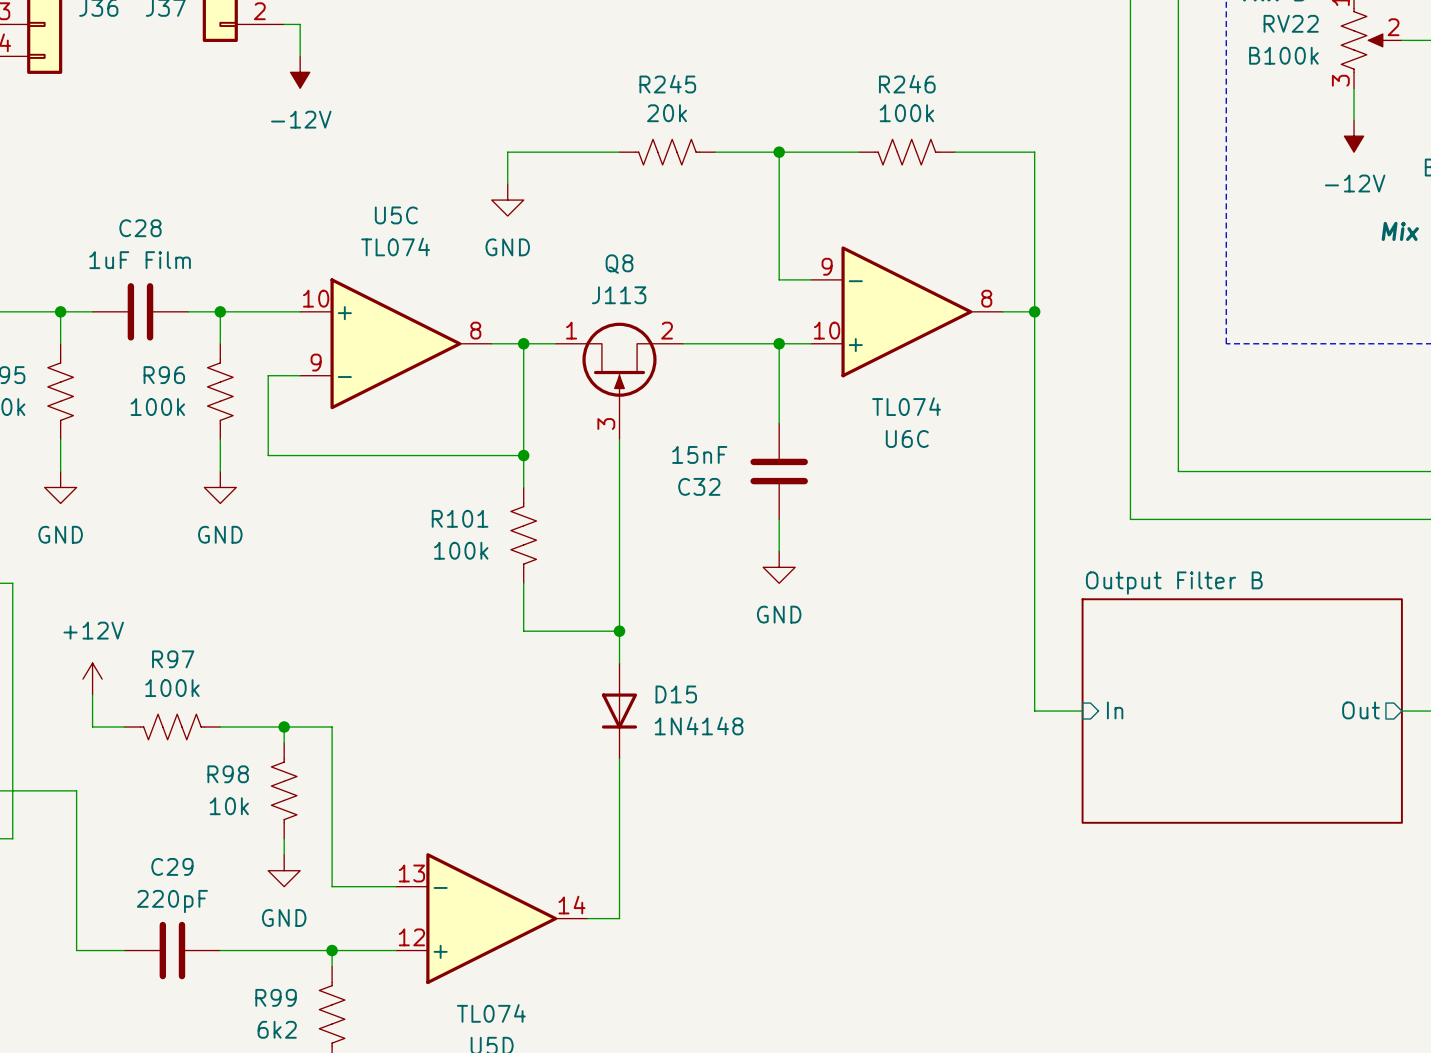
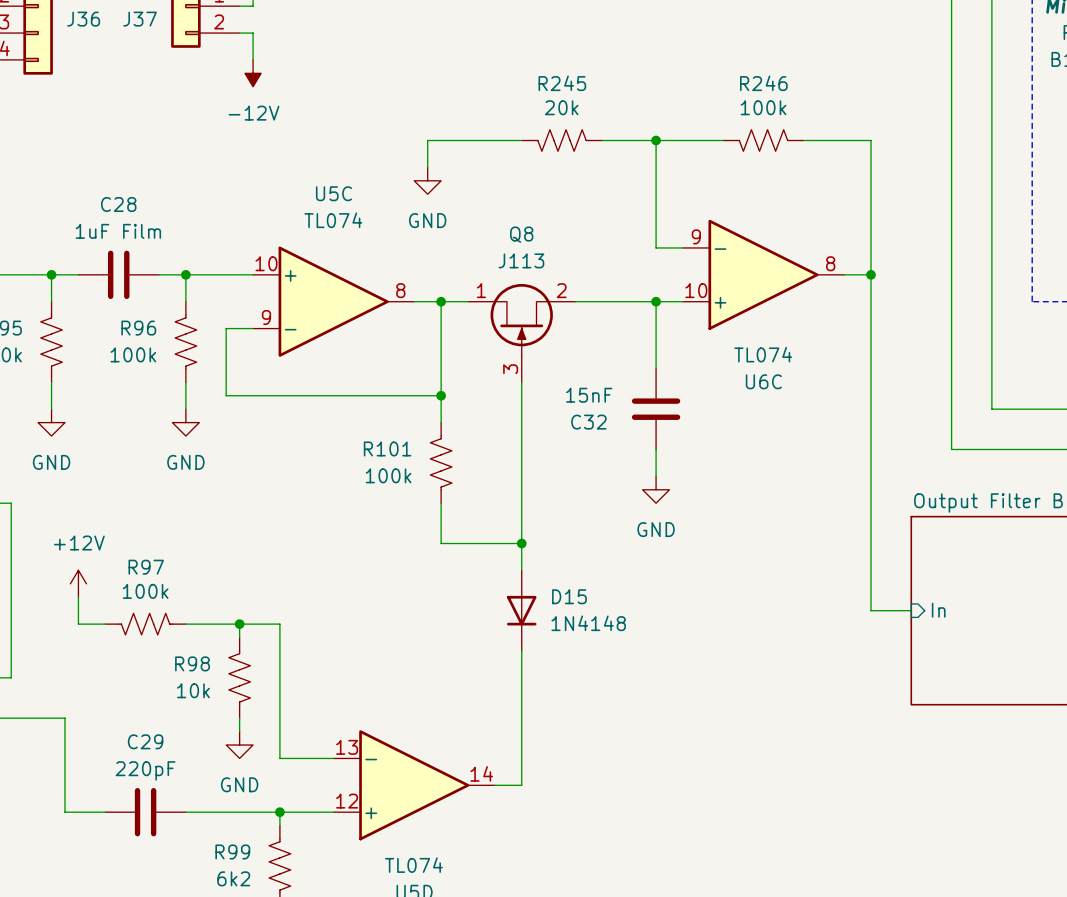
wire: (12, 838) (12, 790) (76, 790) (76, 838) -> (11, 718) (64, 718)

